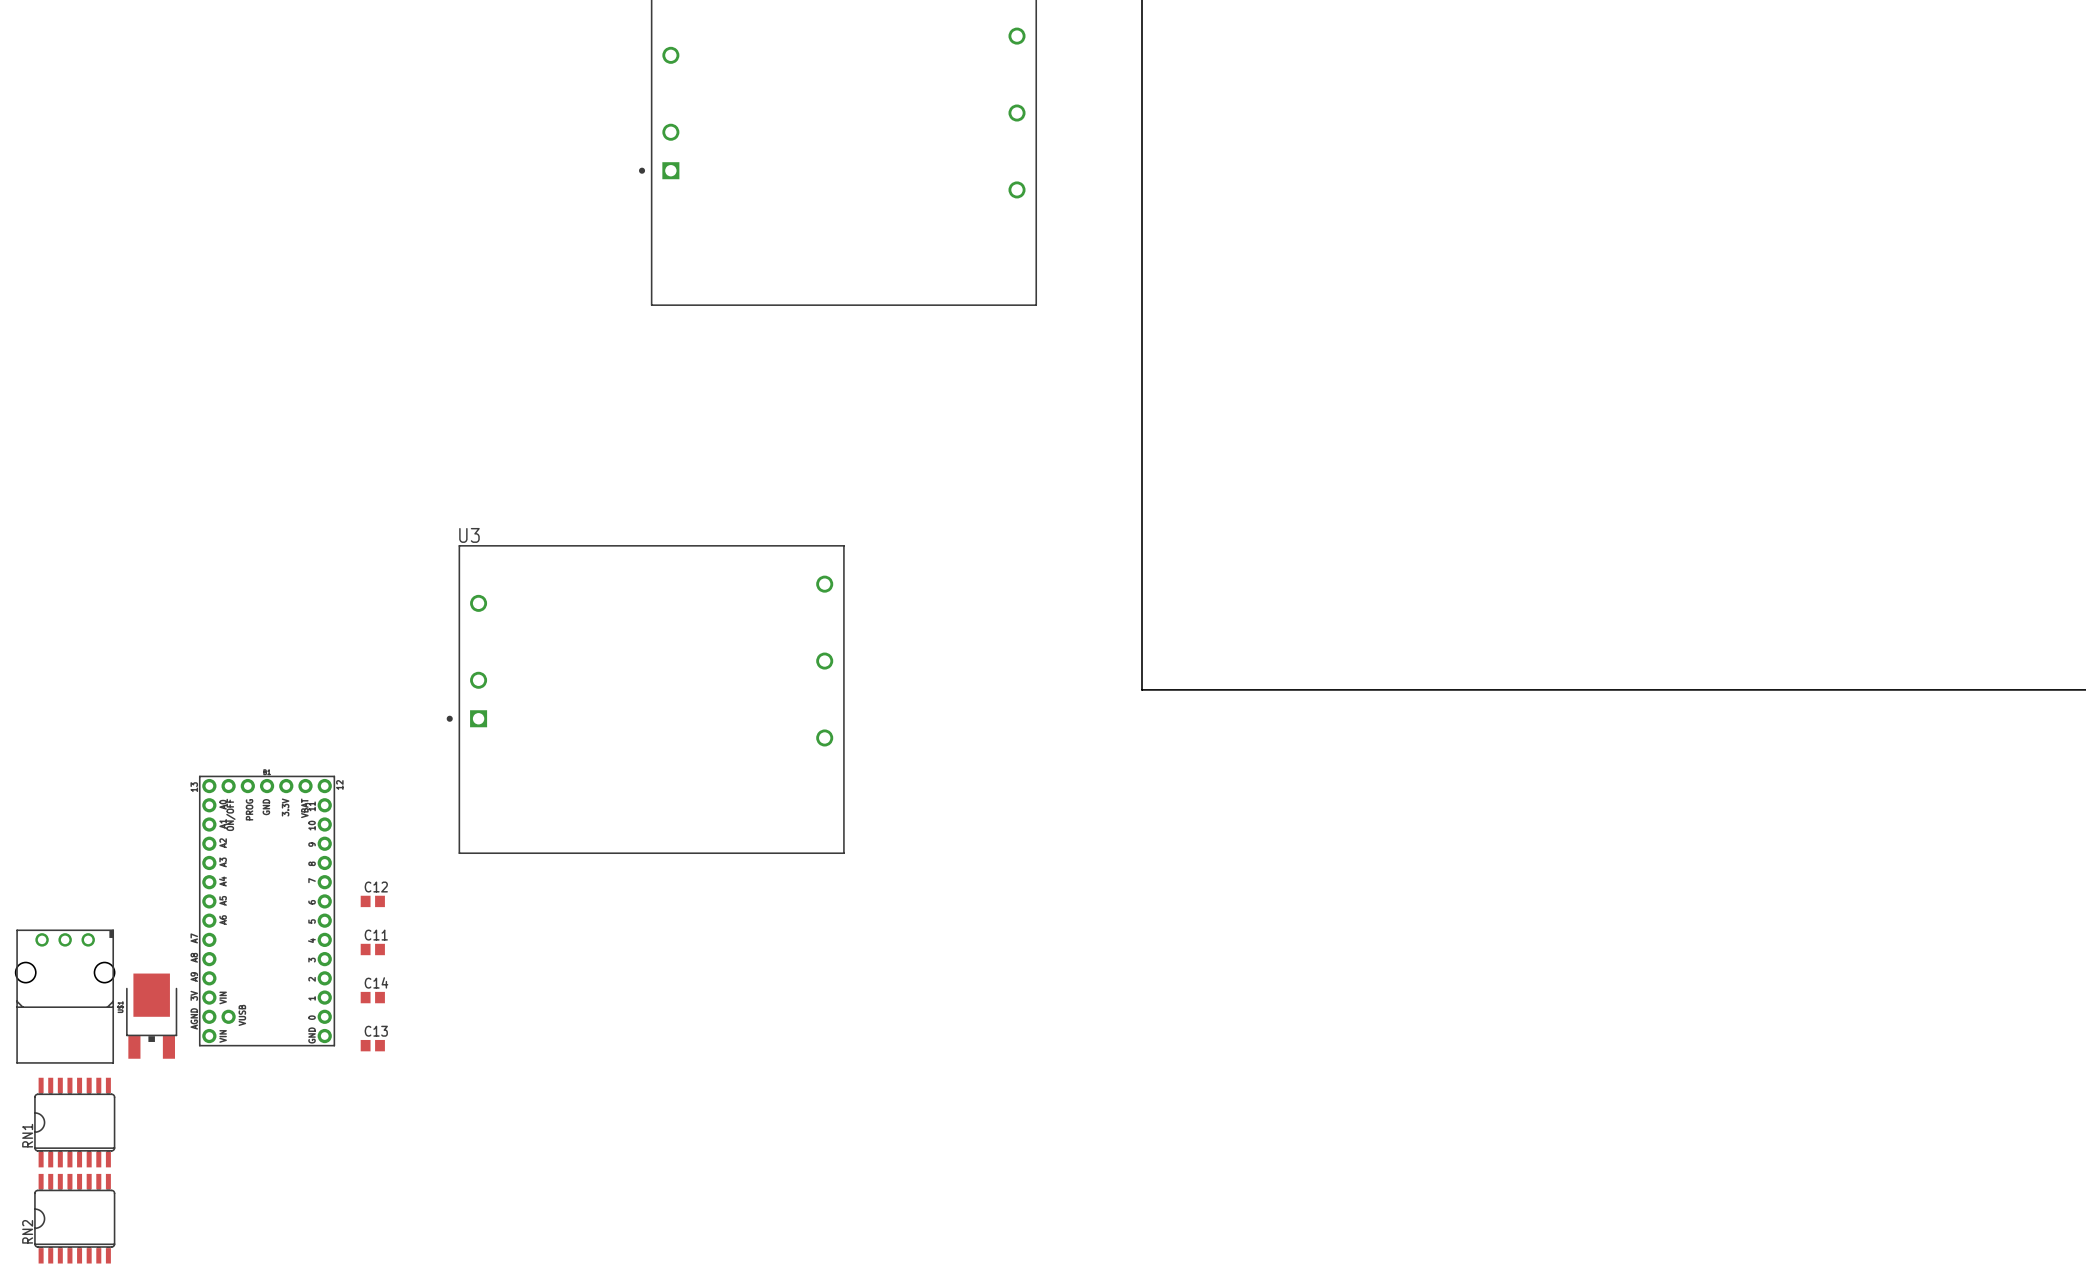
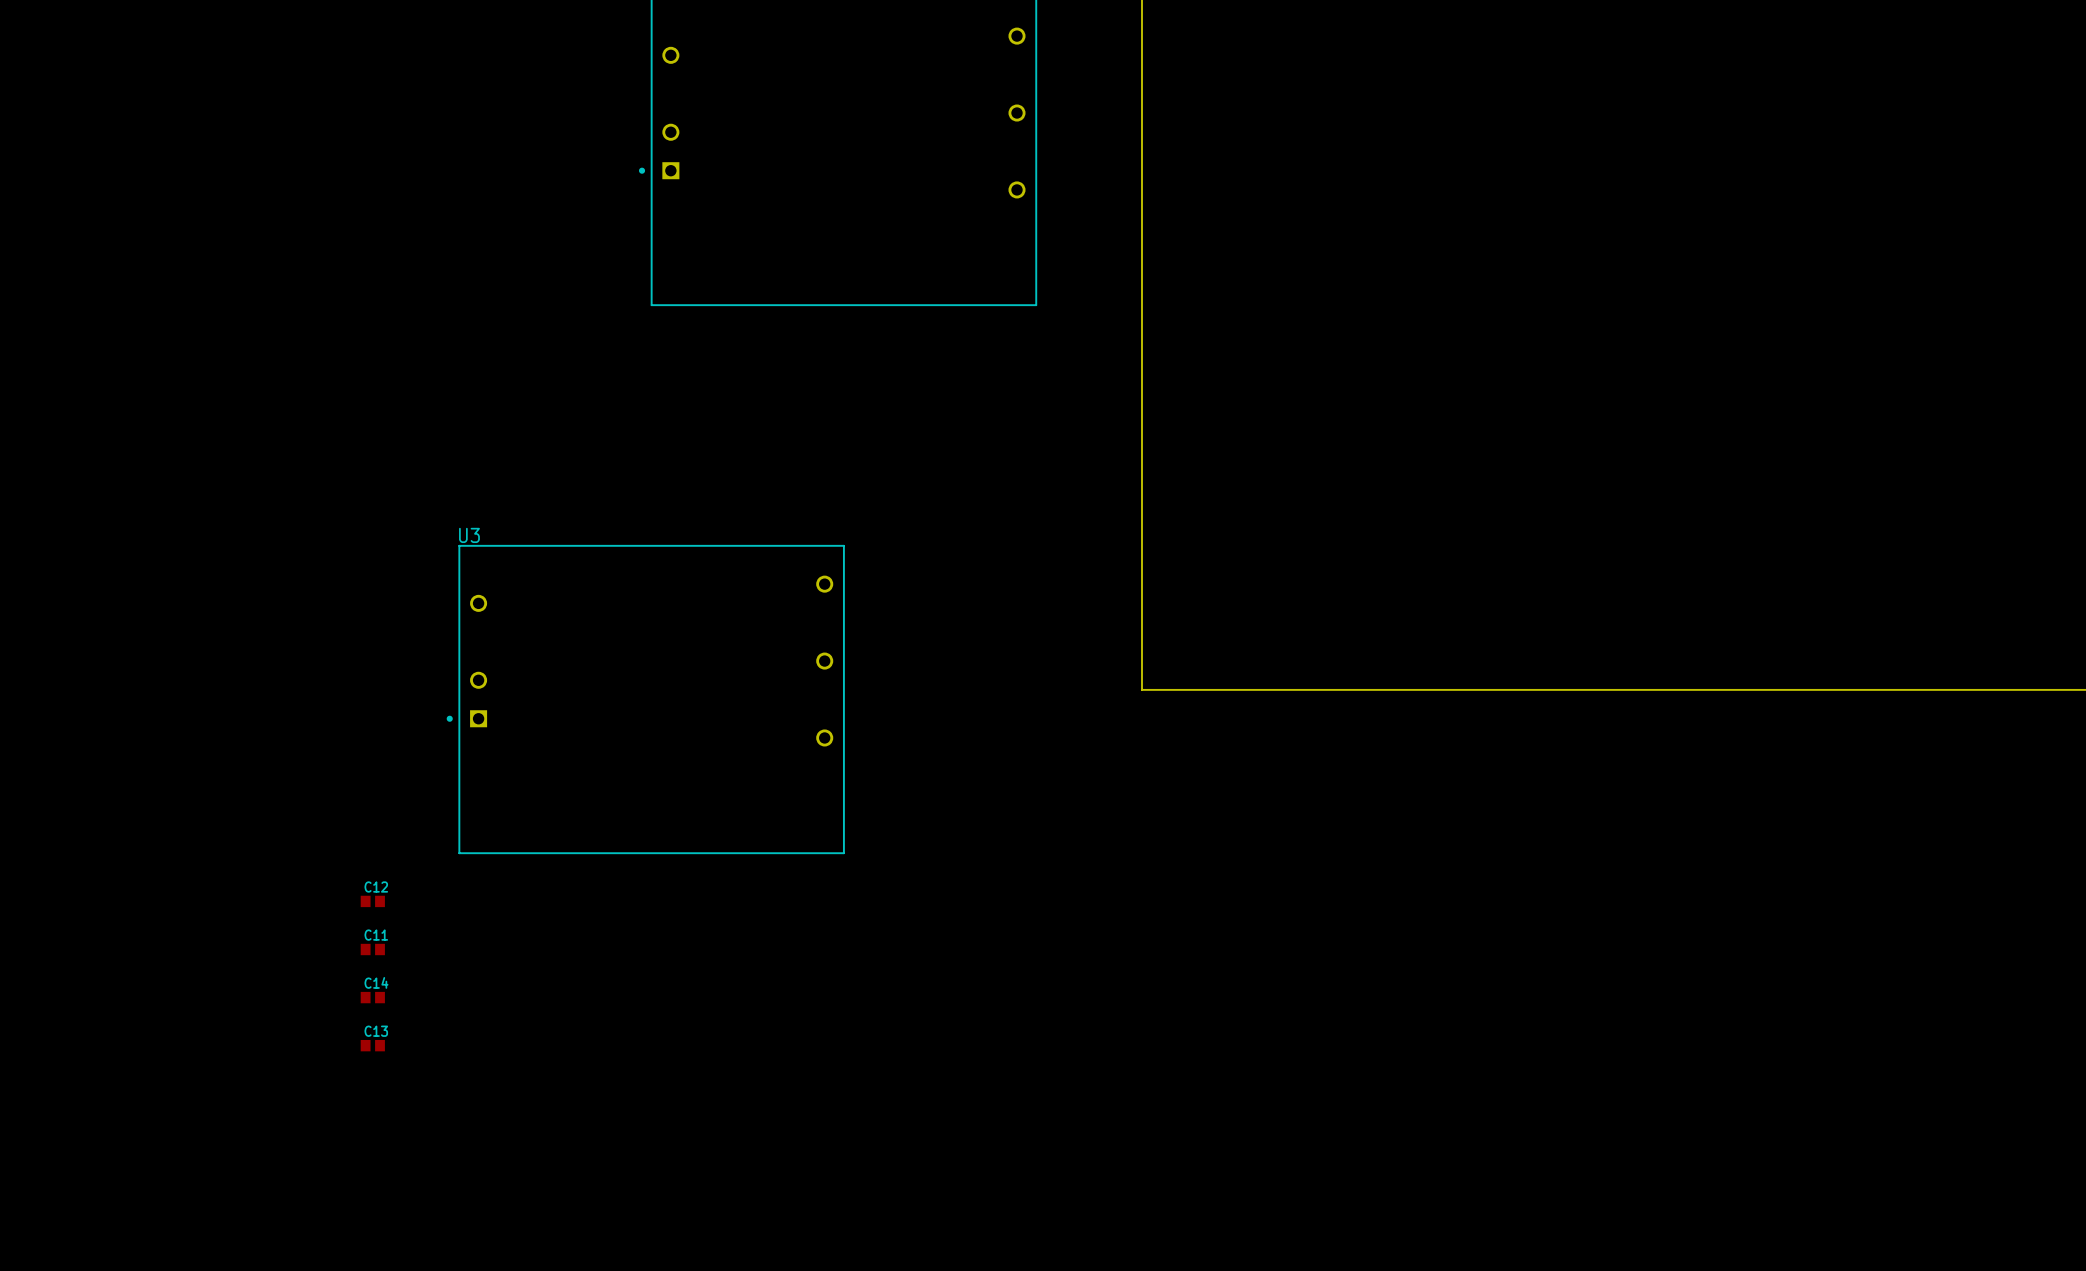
part: (267, 911) -> none
part: (65, 996) -> none
part: (151, 1016) -> none
RN1: (74, 1122) -> none
RN2: (74, 1218) -> none

